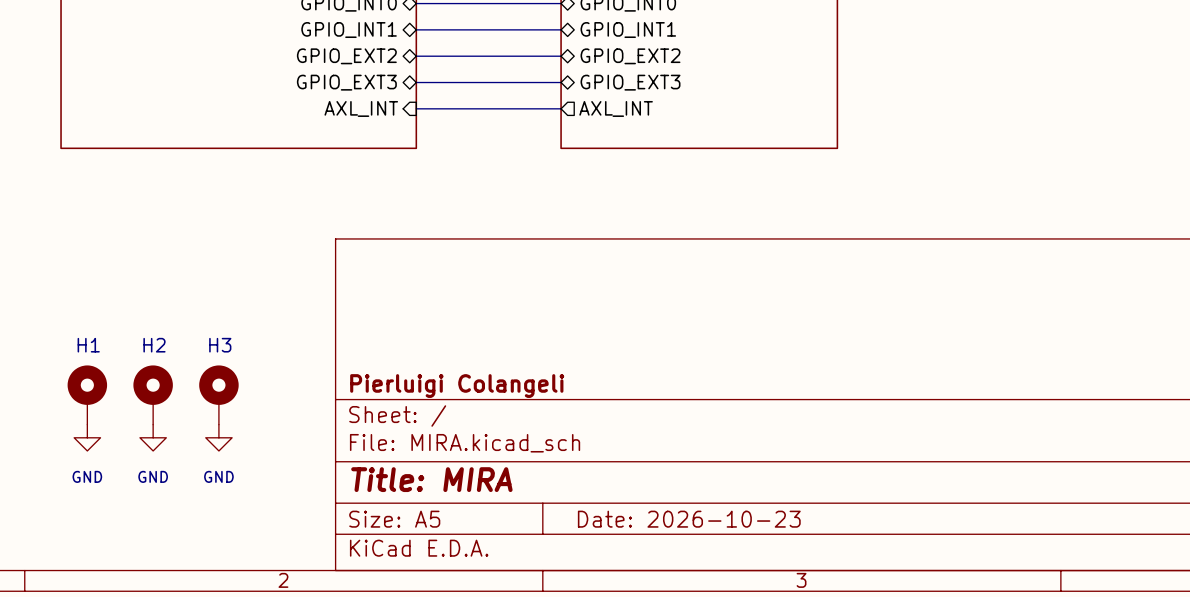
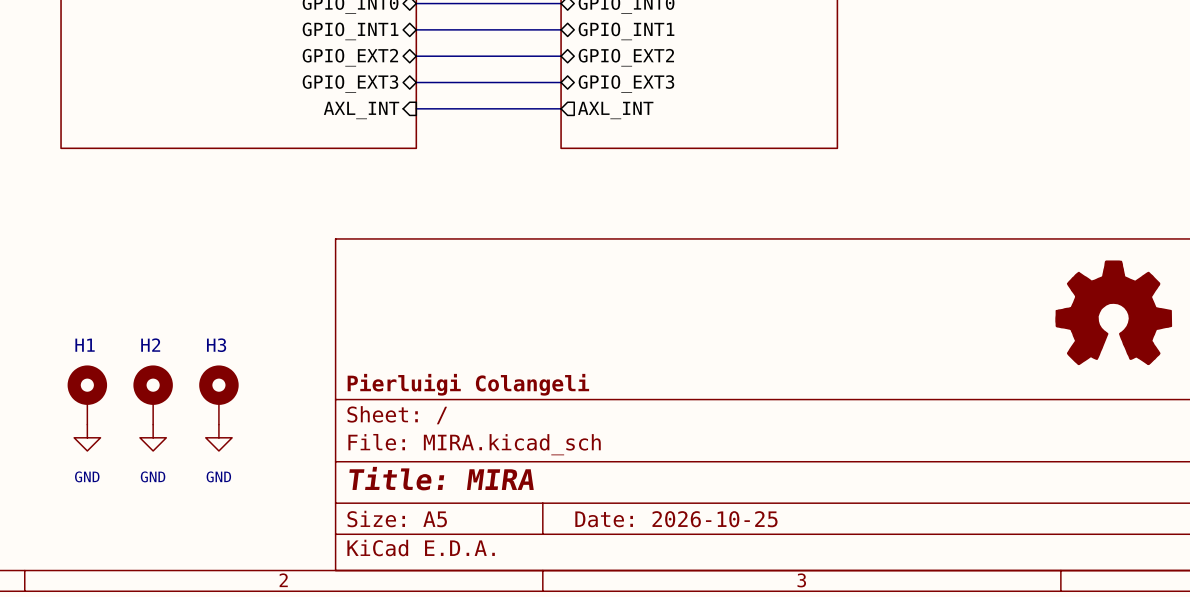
power symbol: none -> (1113, 312)
title block: Date: 2026-10-23 (689, 519) -> Date: 2026-10-25 (676, 519)

